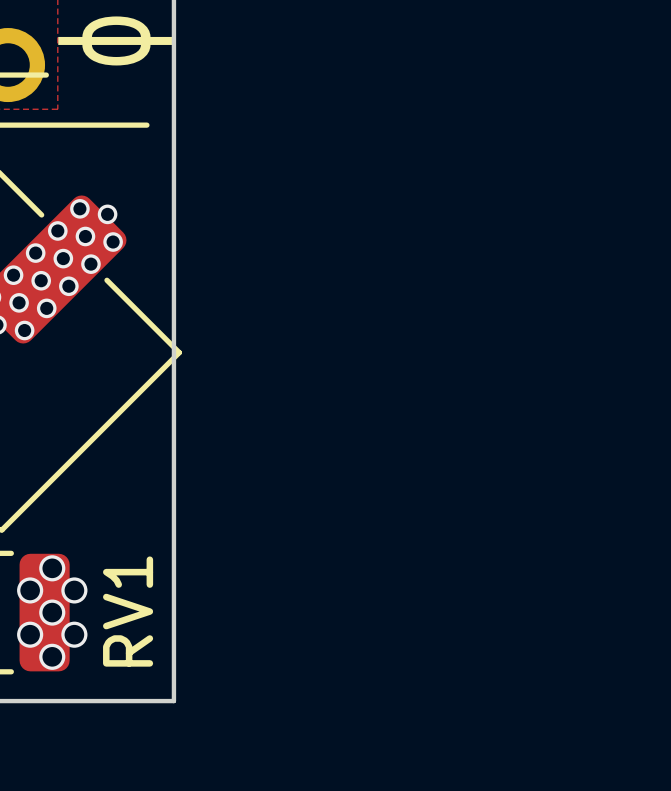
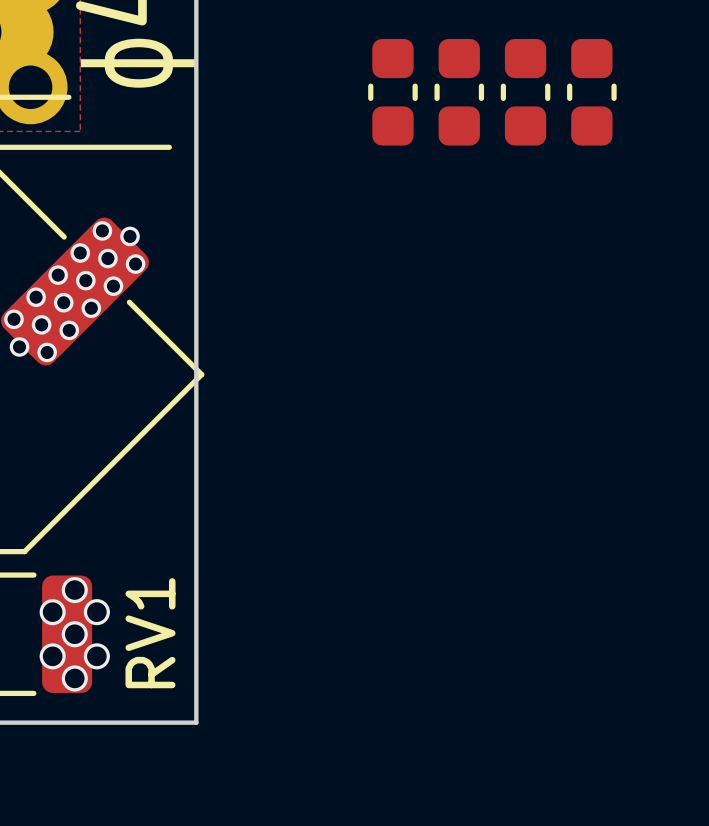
part: none -> (392, 92)
part: none -> (459, 92)
part: none -> (525, 92)
part: none -> (591, 92)

